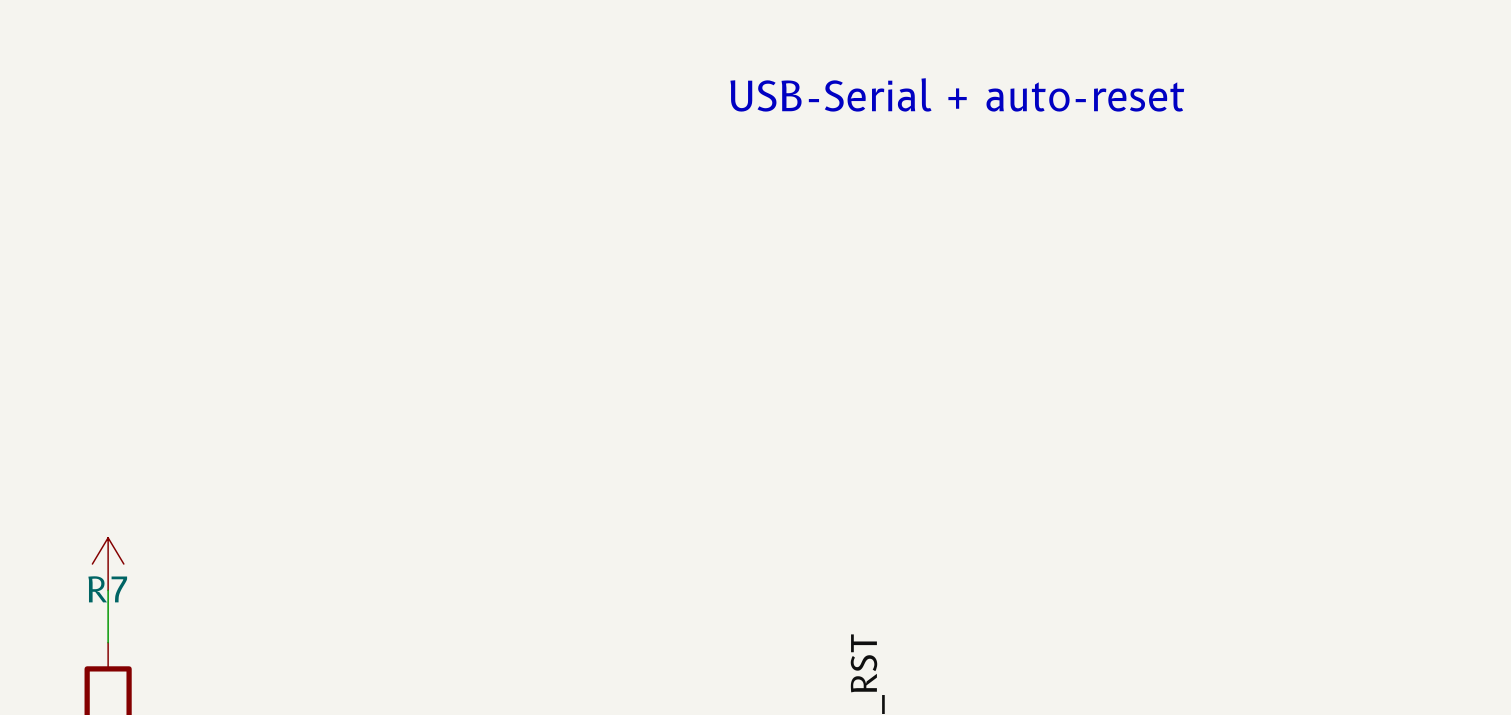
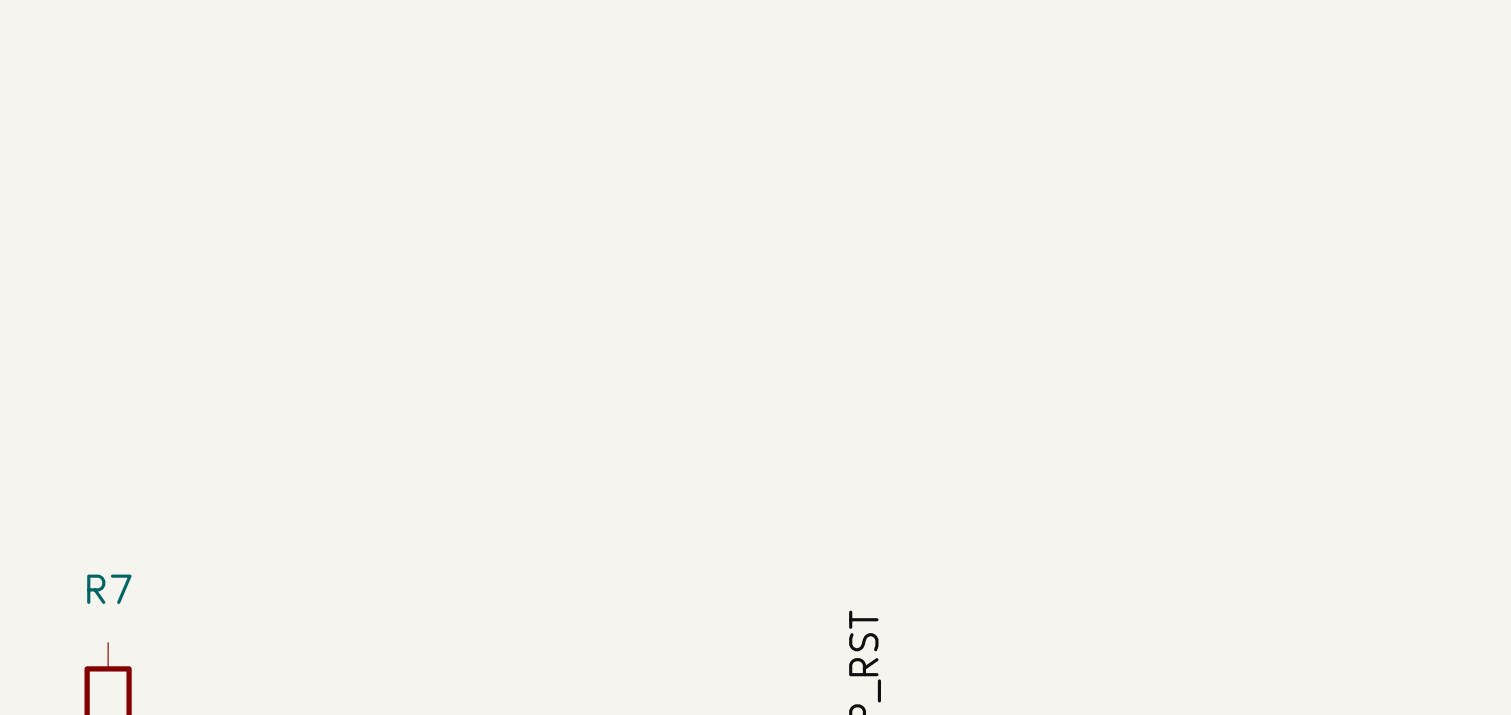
text: USB-Serial + auto-reset (957, 94) -> none
power symbol: (108, 564) -> none
wire: (108, 590) (108, 642) -> none

